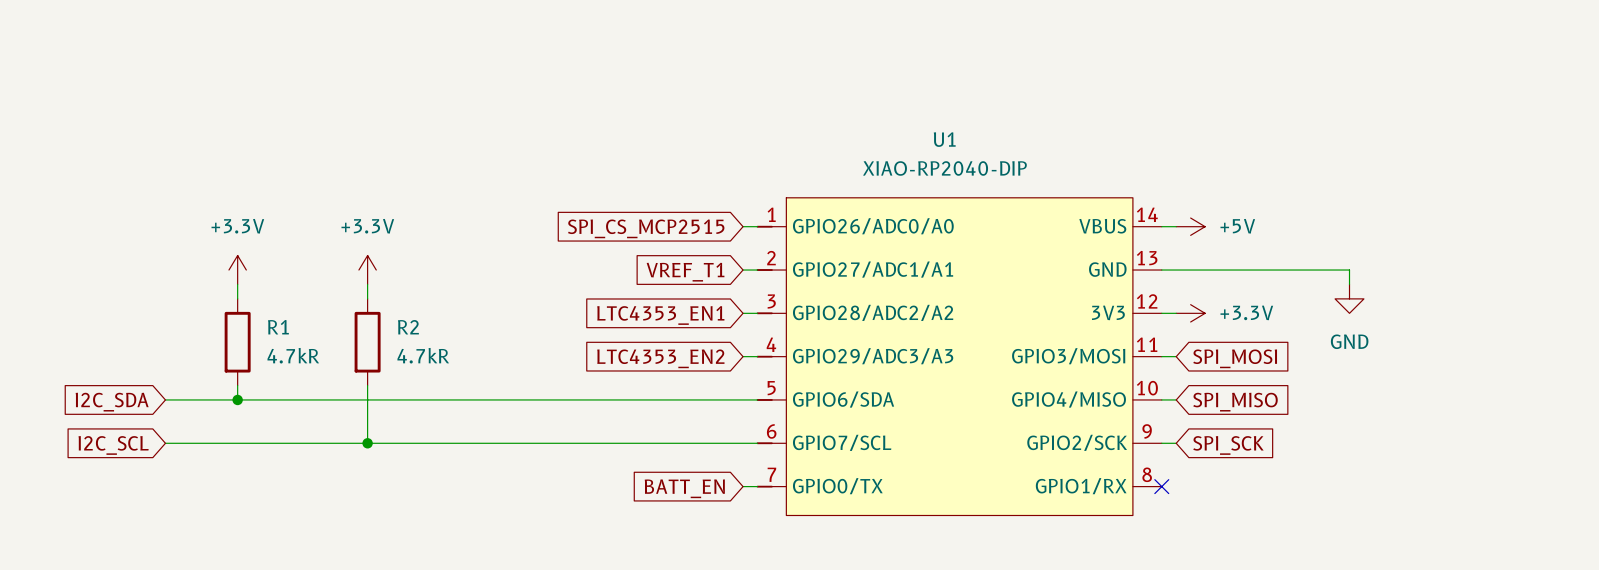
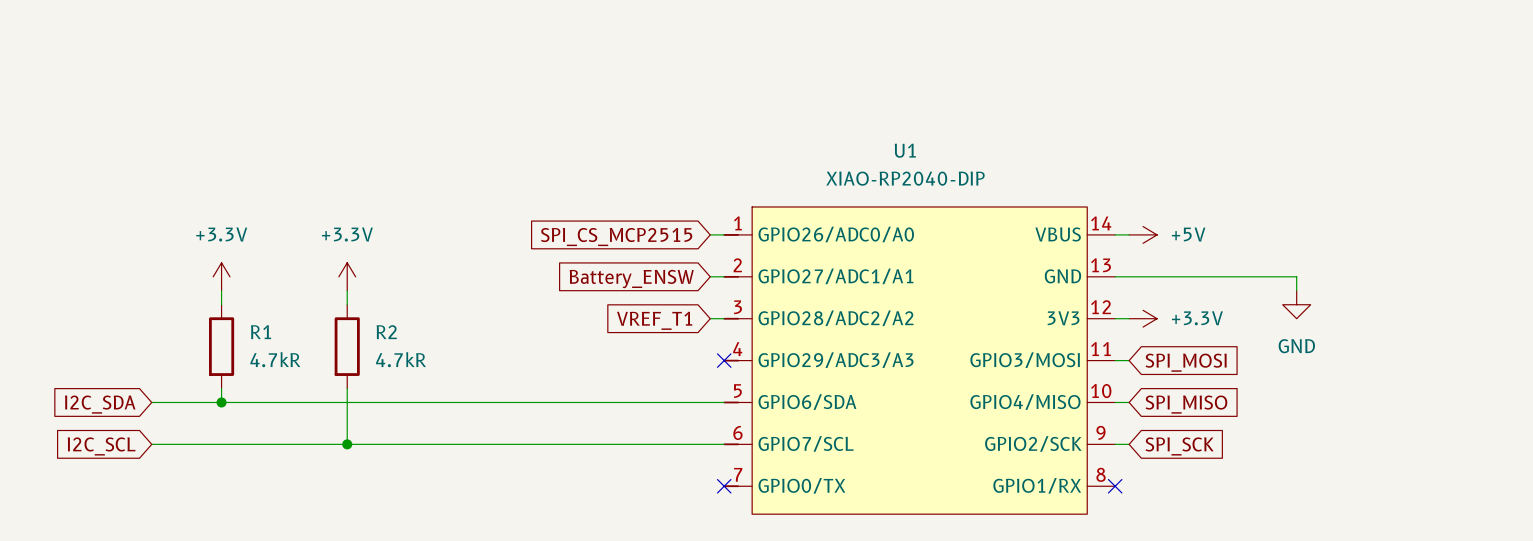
global label: VREF_T1 (685, 272) -> Battery_ENSW (631, 279)
global label: LTC4353_EN1 (660, 315) -> VREF_T1 (654, 320)
wire: (743, 356) (757, 356) -> none
no-connect mark: none -> (724, 360)
global label: LTC4353_EN2 (660, 358) -> none
wire: (743, 486) (757, 486) -> none
no-connect mark: none -> (724, 486)
global label: BATT_EN (684, 488) -> none

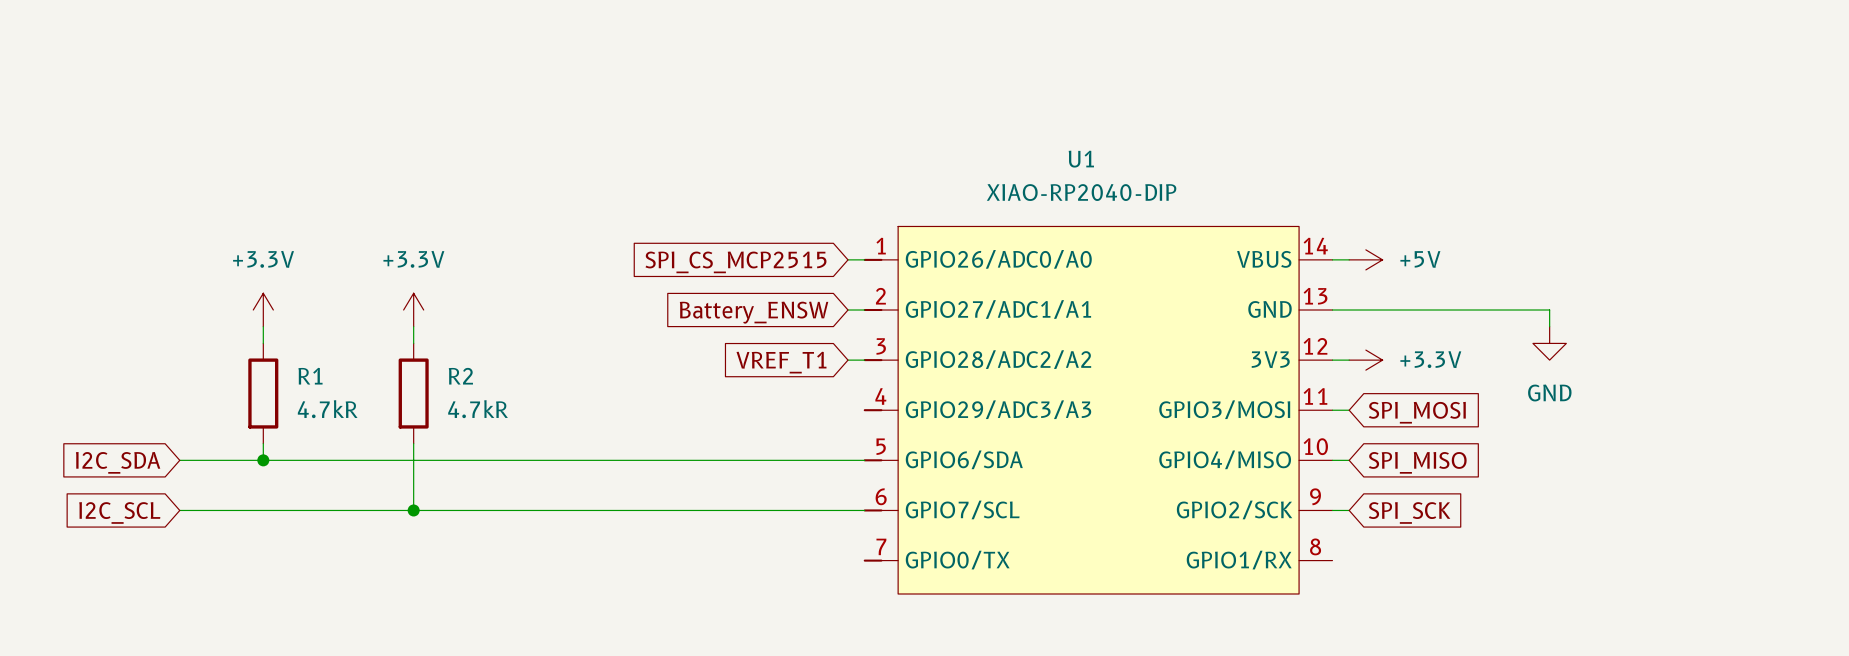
no-connect mark: (724, 360) -> none
no-connect mark: (724, 486) -> none
no-connect mark: (1115, 486) -> none

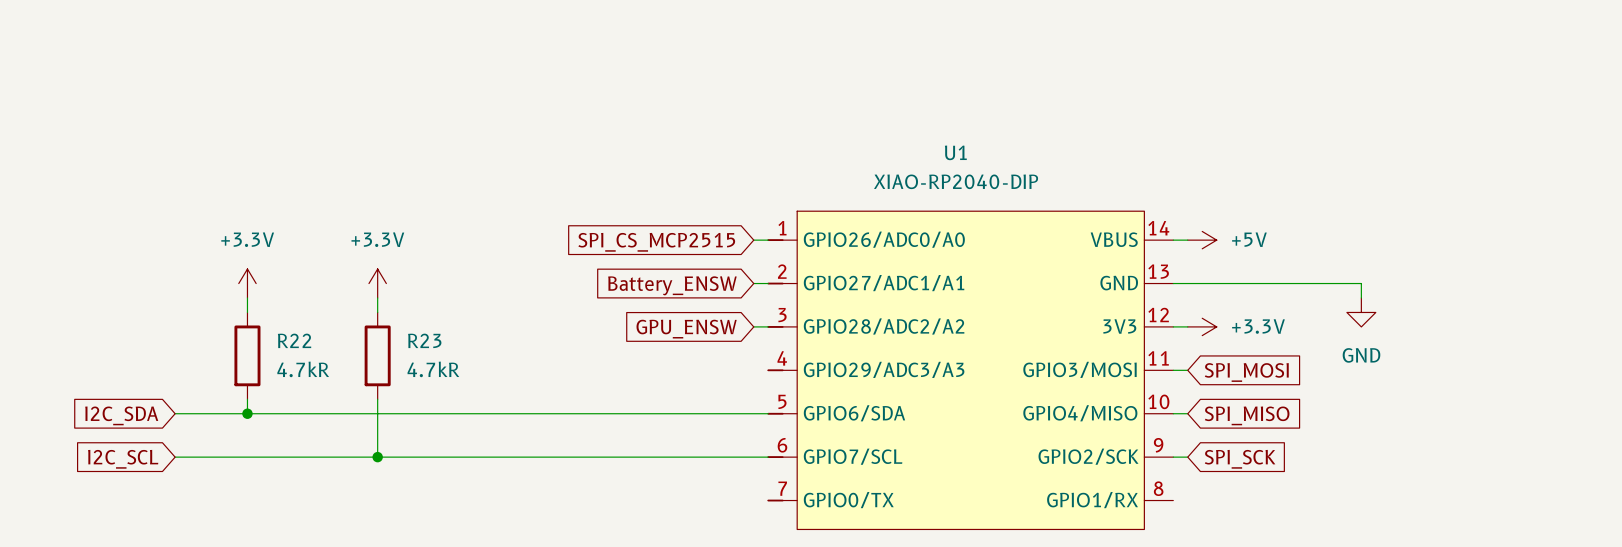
global label: VREF_T1 (781, 362) -> GPU_ENSW (686, 329)
R1 name: R1 (310, 376) -> R22 (294, 340)
R2 name: R2 (460, 376) -> R23 (424, 340)

